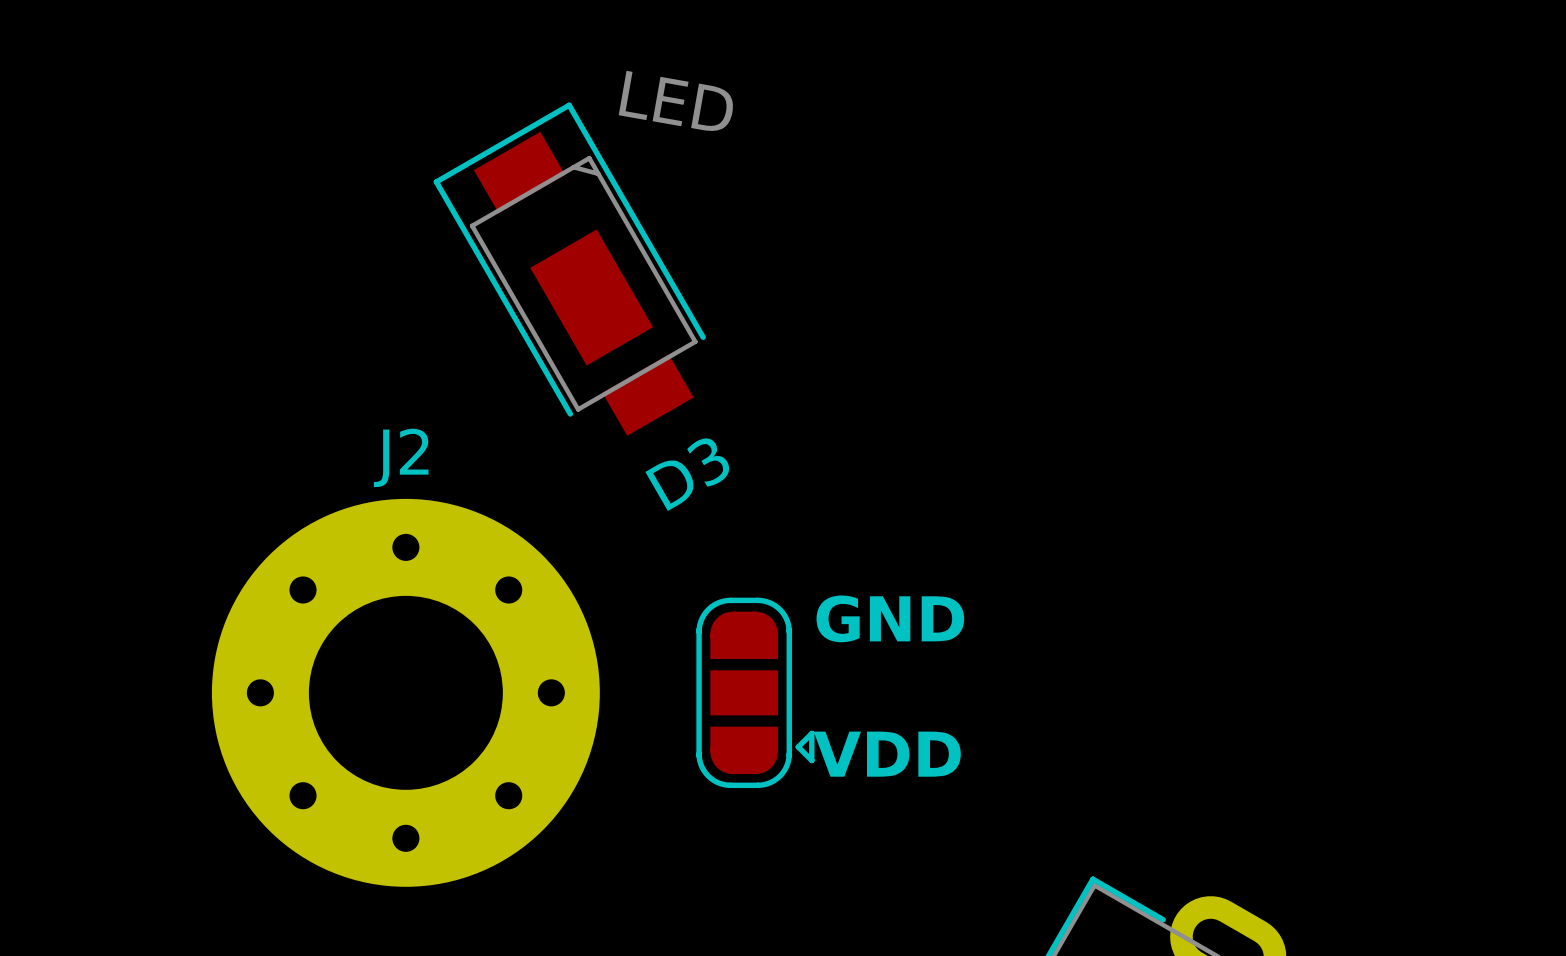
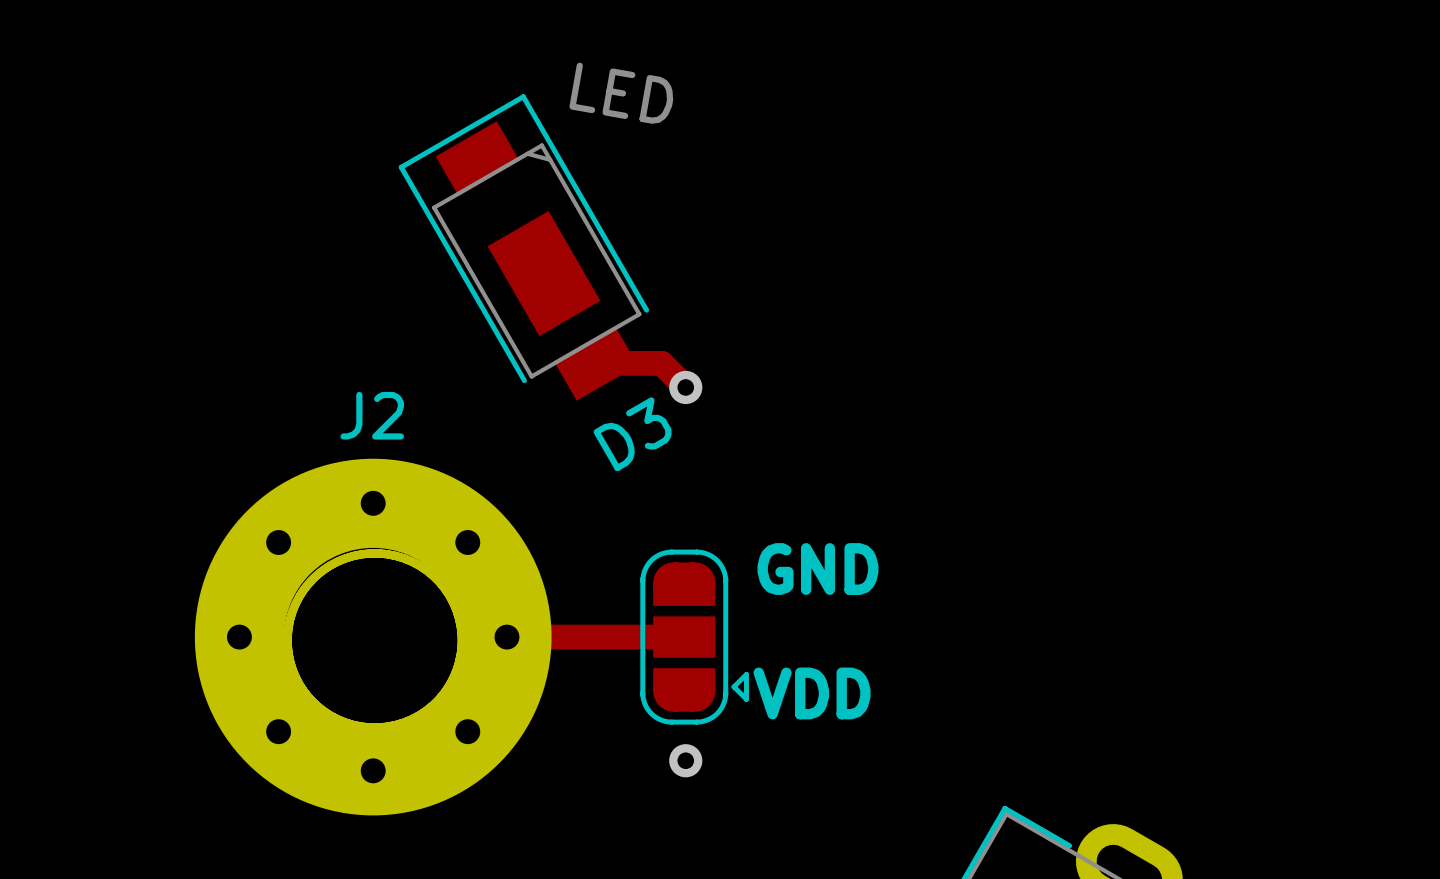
top track: none -> (595, 363) (661, 363) (685, 387)
via: none -> (685, 387)
round board edge: none -> [283, 549, 466, 732]
top track: none -> (506, 637) (684, 637)
via: none -> (685, 760)

